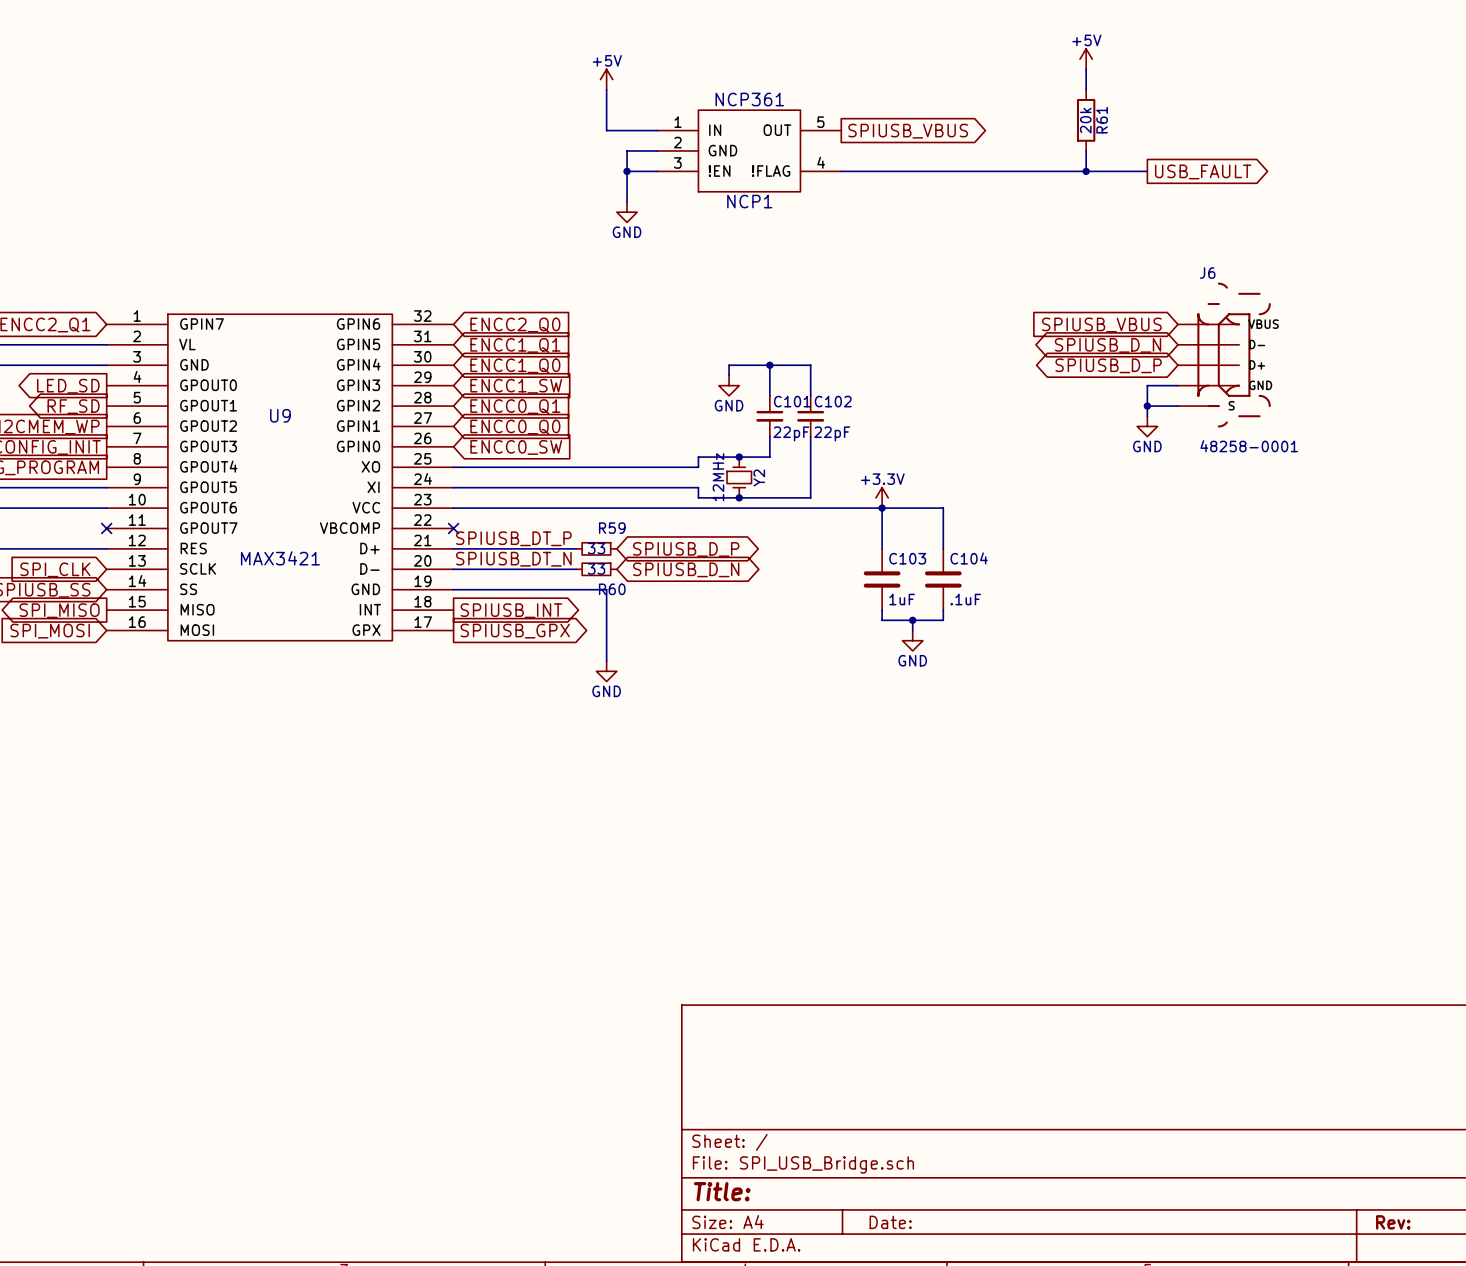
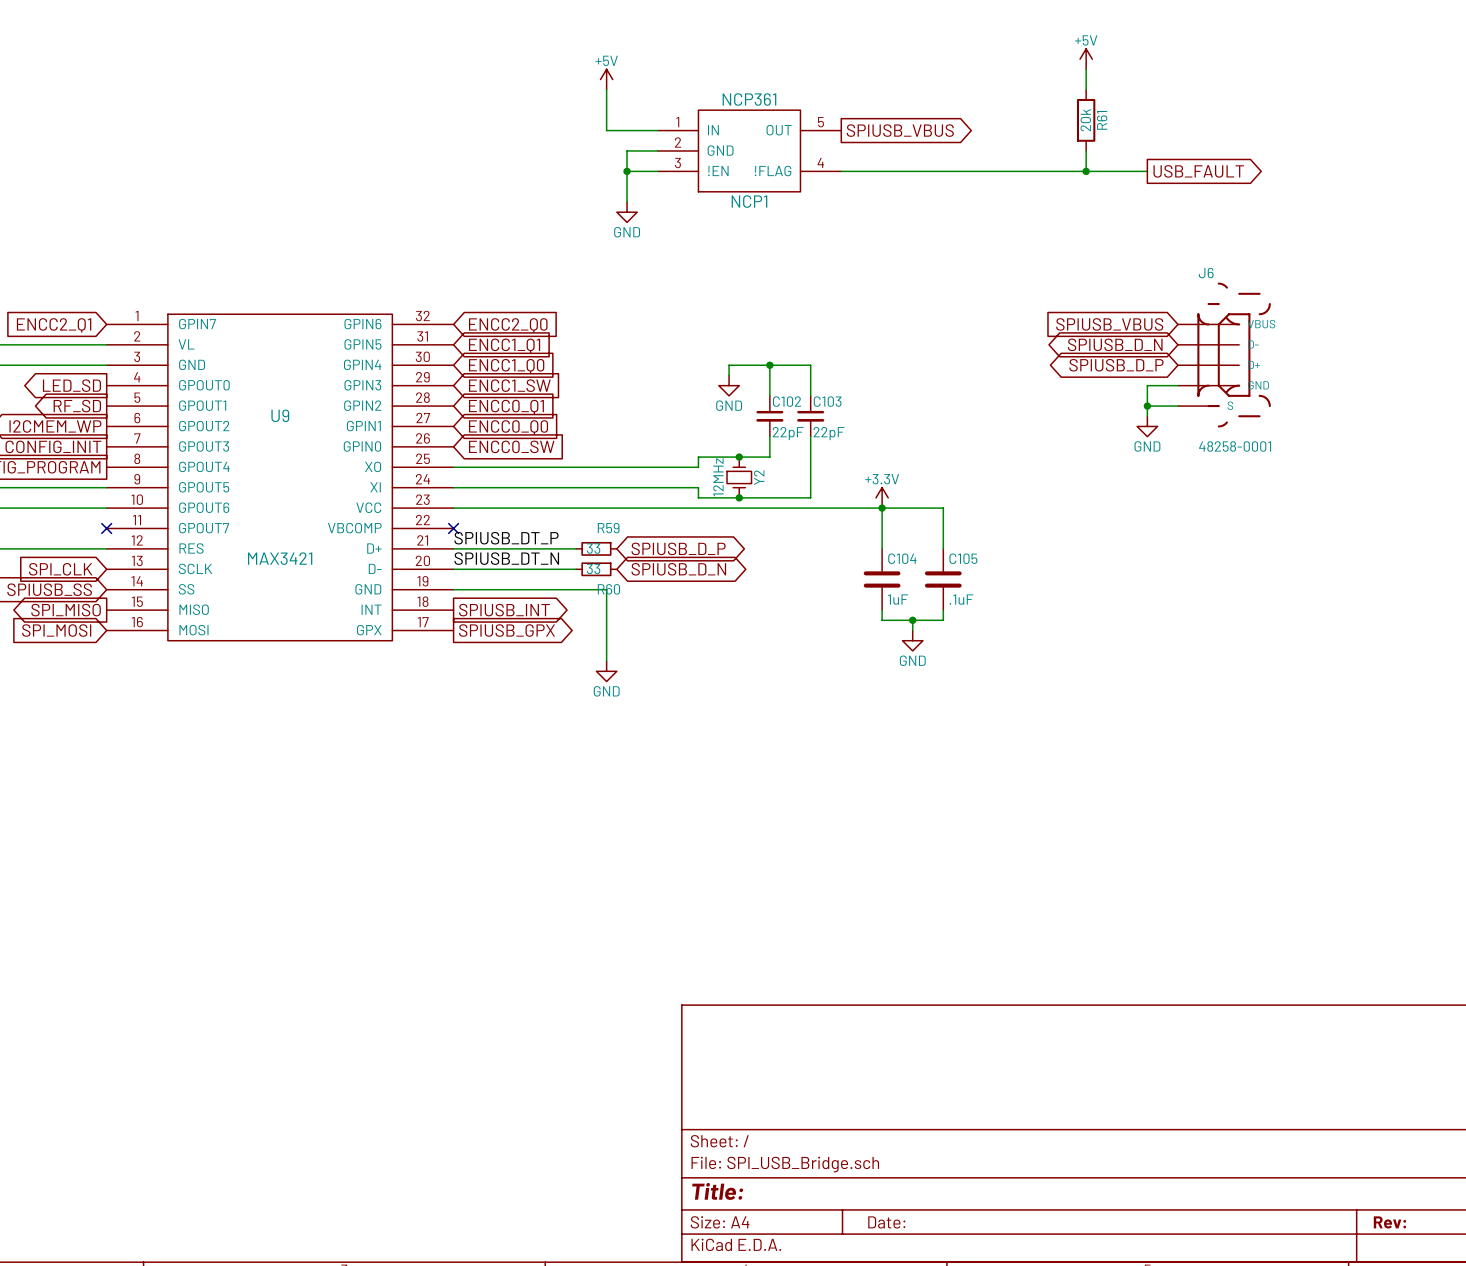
C101 name: C101 (792, 401) -> C102 (787, 401)
C102 name: C102 (833, 401) -> C103 (827, 401)
C103 name: C103 (907, 558) -> C104 (902, 558)
C104 name: C104 (969, 558) -> C105 (963, 558)

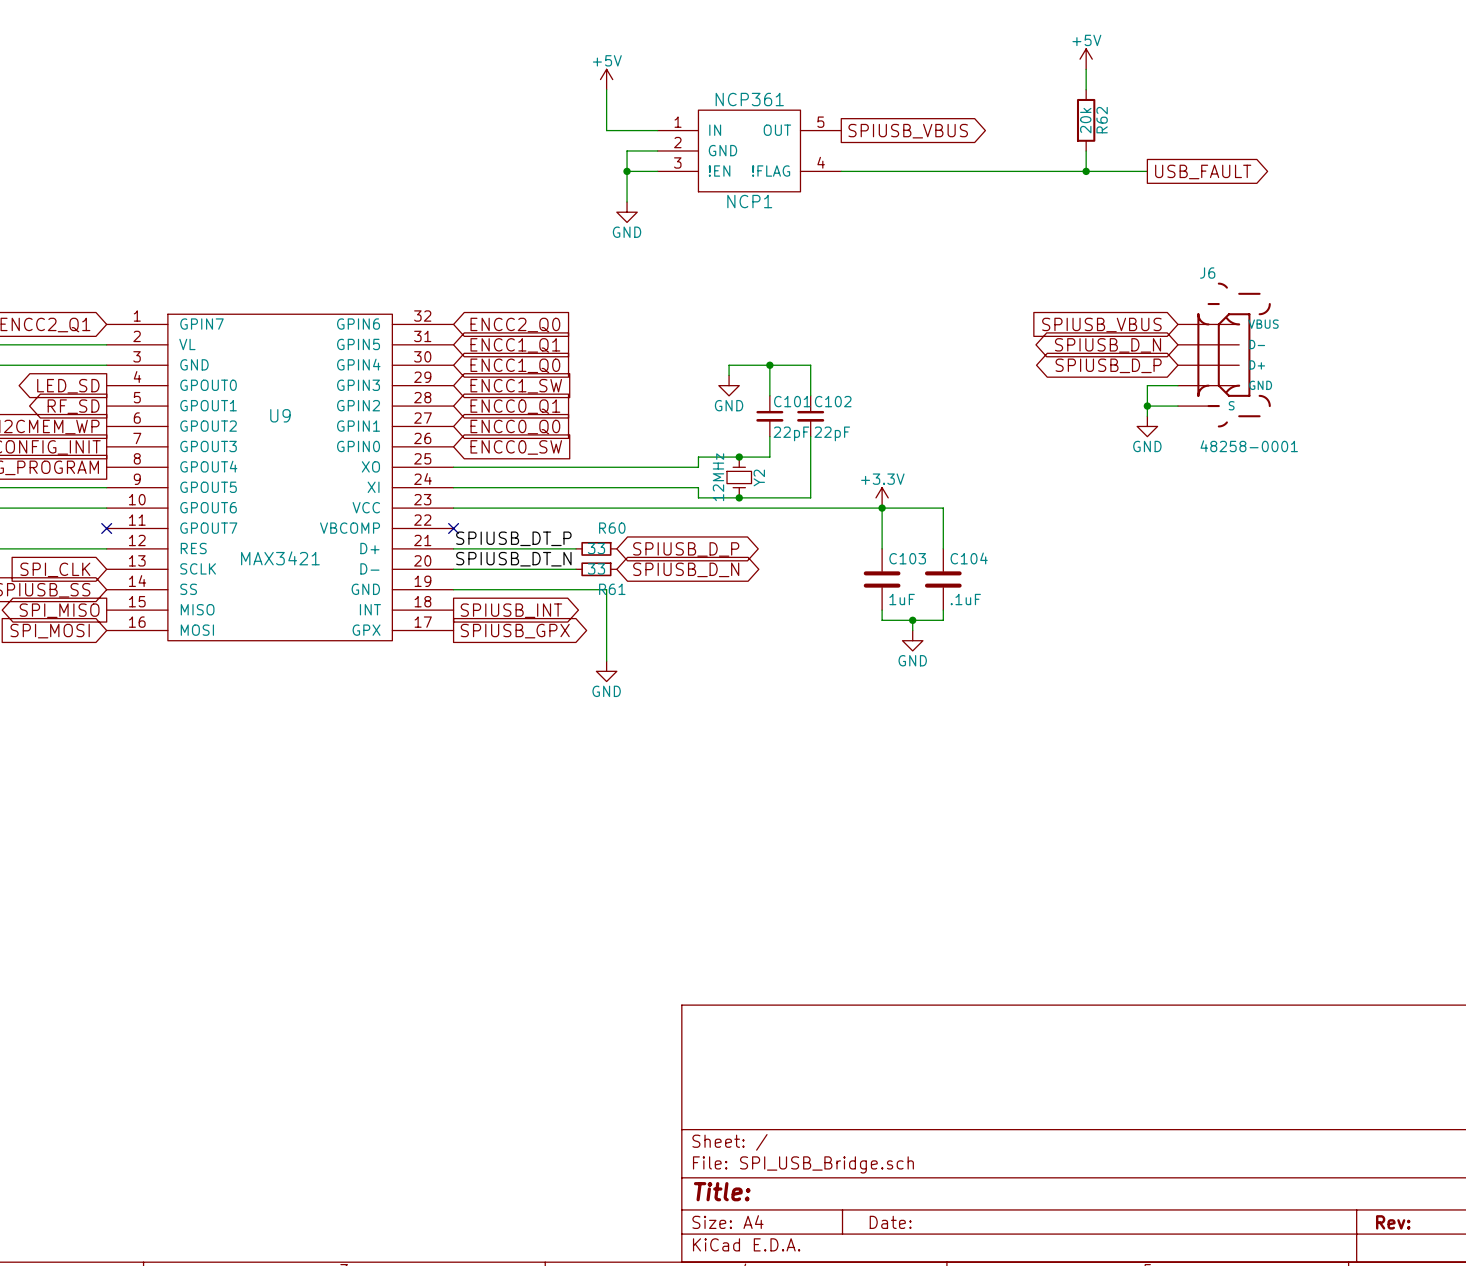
R61 name: R61 (1102, 120) -> R62 (1102, 120)
C102 name: C102 (787, 401) -> C101 (792, 401)
C103 name: C103 (827, 401) -> C102 (833, 401)
R59 name: R59 (608, 528) -> R60 (612, 528)
C104 name: C104 (902, 558) -> C103 (907, 558)
C105 name: C105 (963, 558) -> C104 (969, 558)
R60 name: R60 (608, 589) -> R61 (612, 589)

